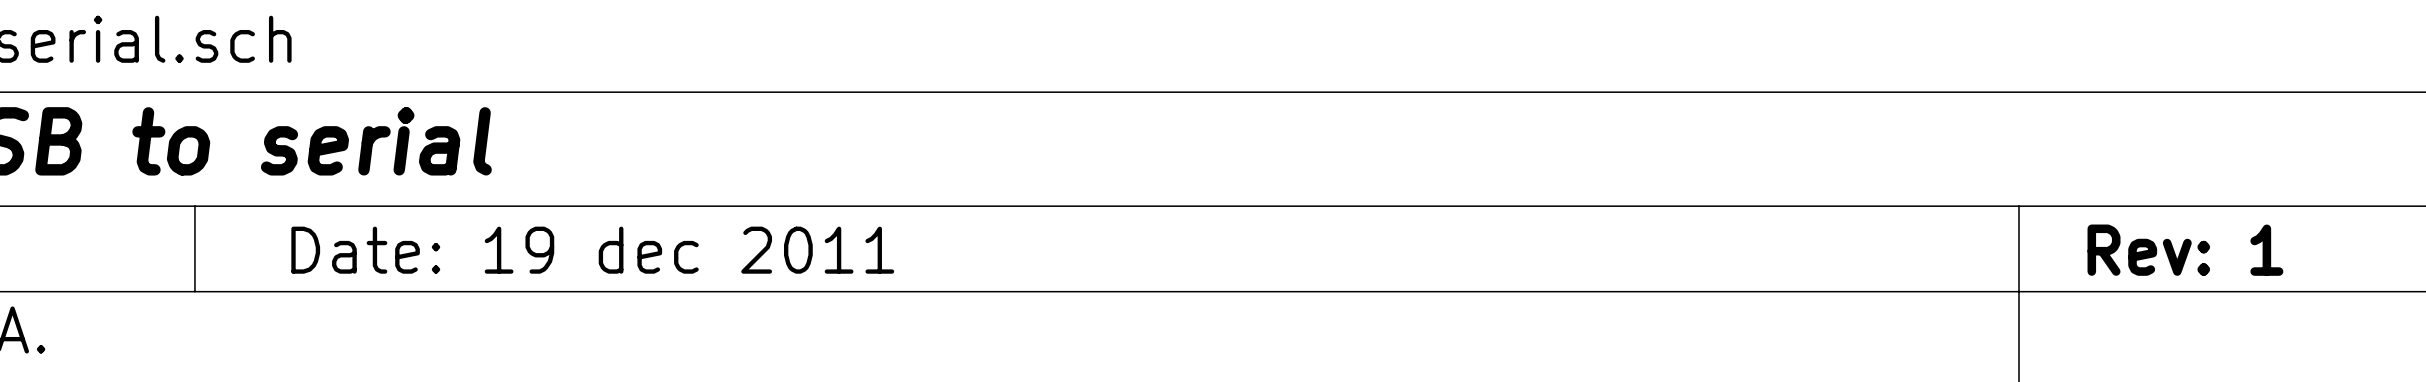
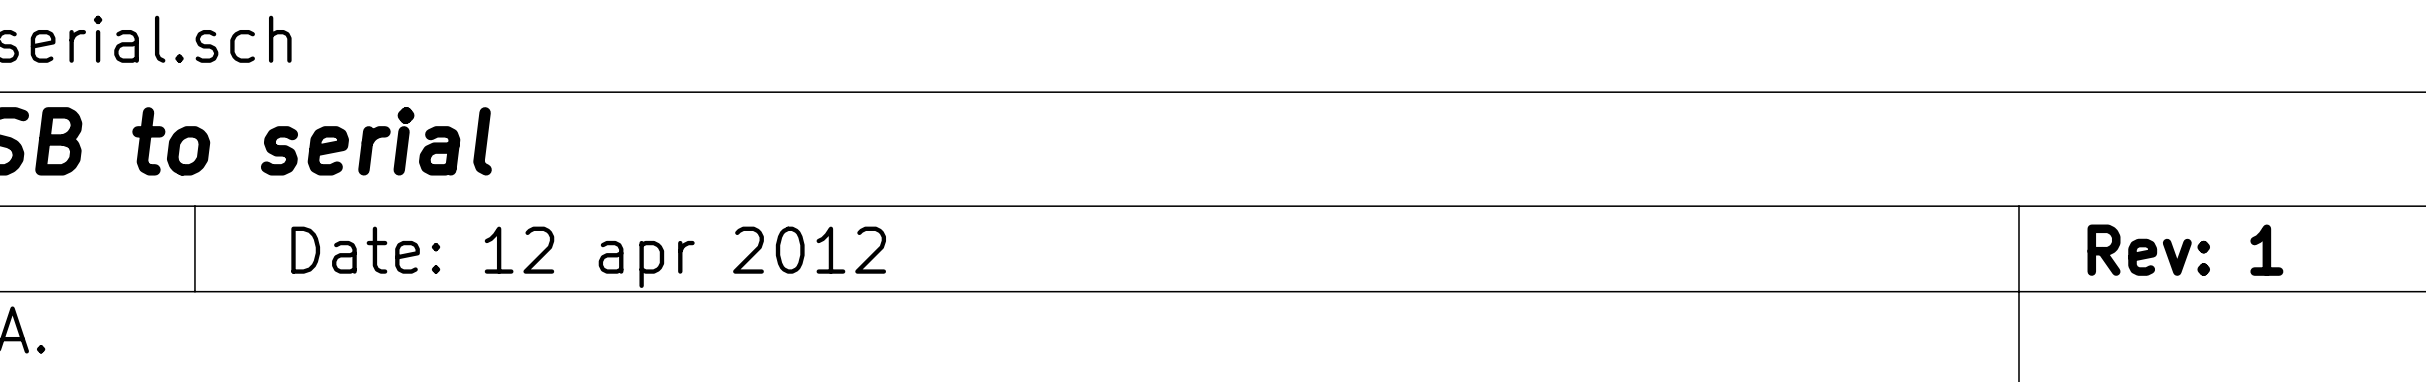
title block: Date: 19 dec 2011 (592, 250) -> Date: 12 apr 2012 (588, 257)

